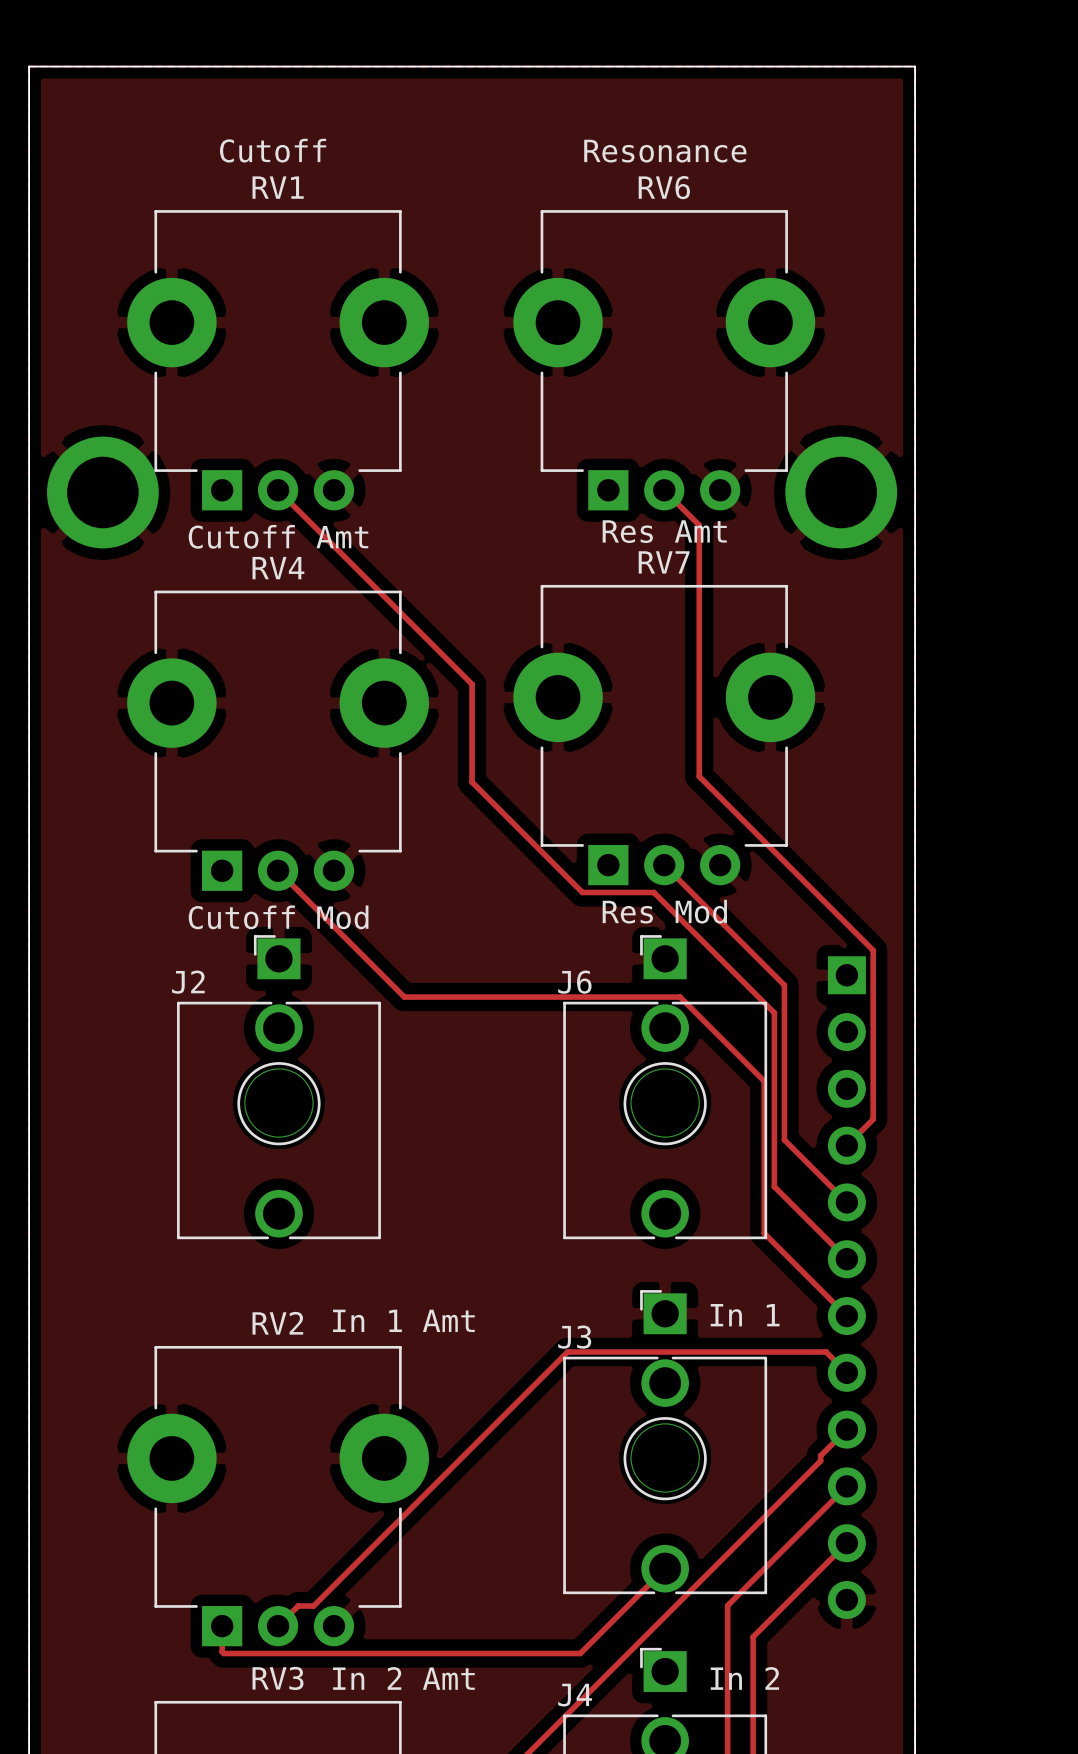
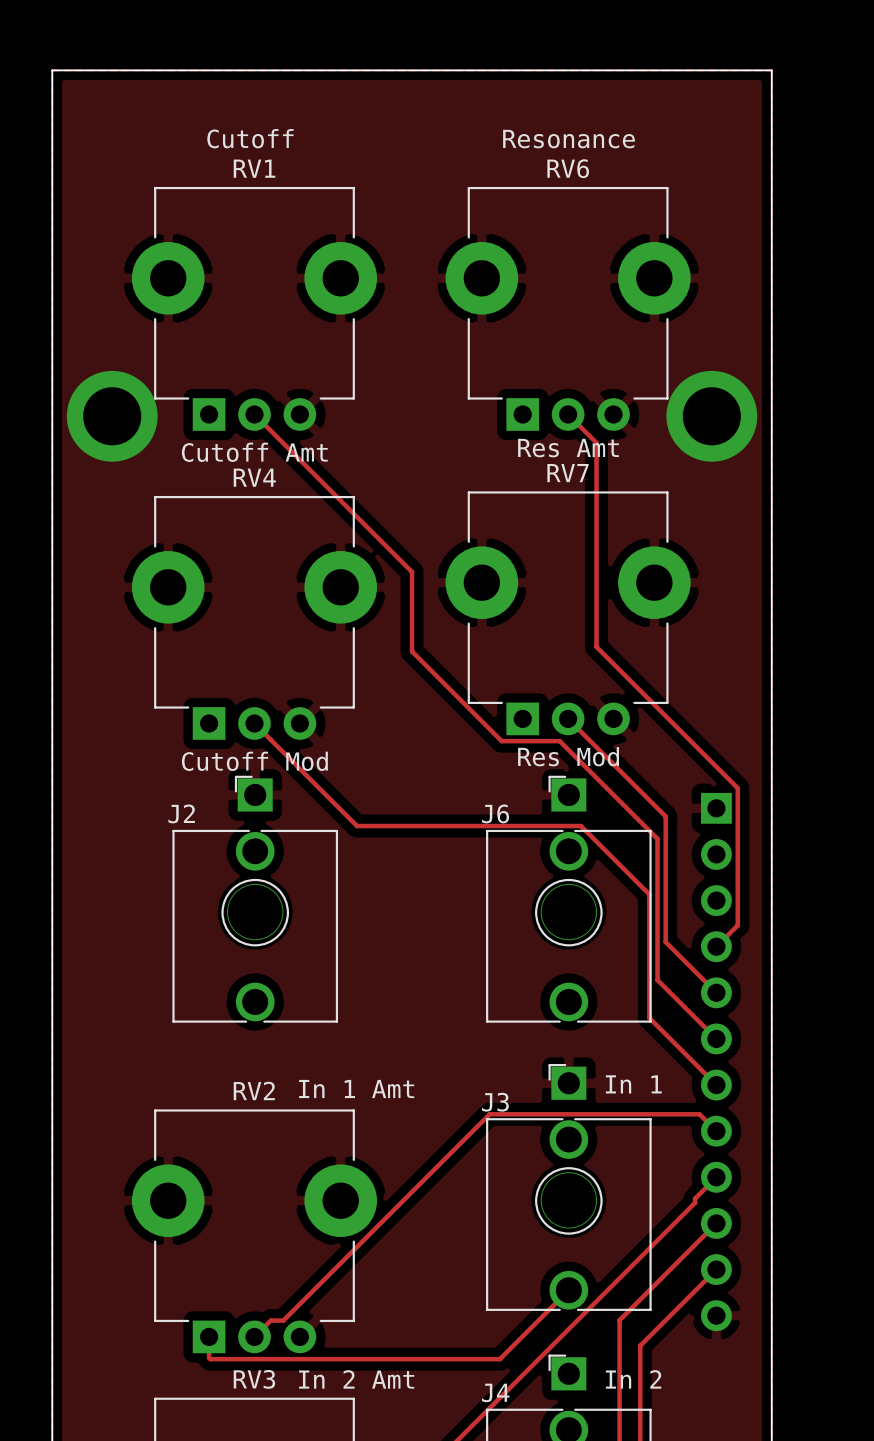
part: (102, 492) -> none
via: none -> (112, 416)
part: (841, 492) -> none
via: none -> (711, 416)

